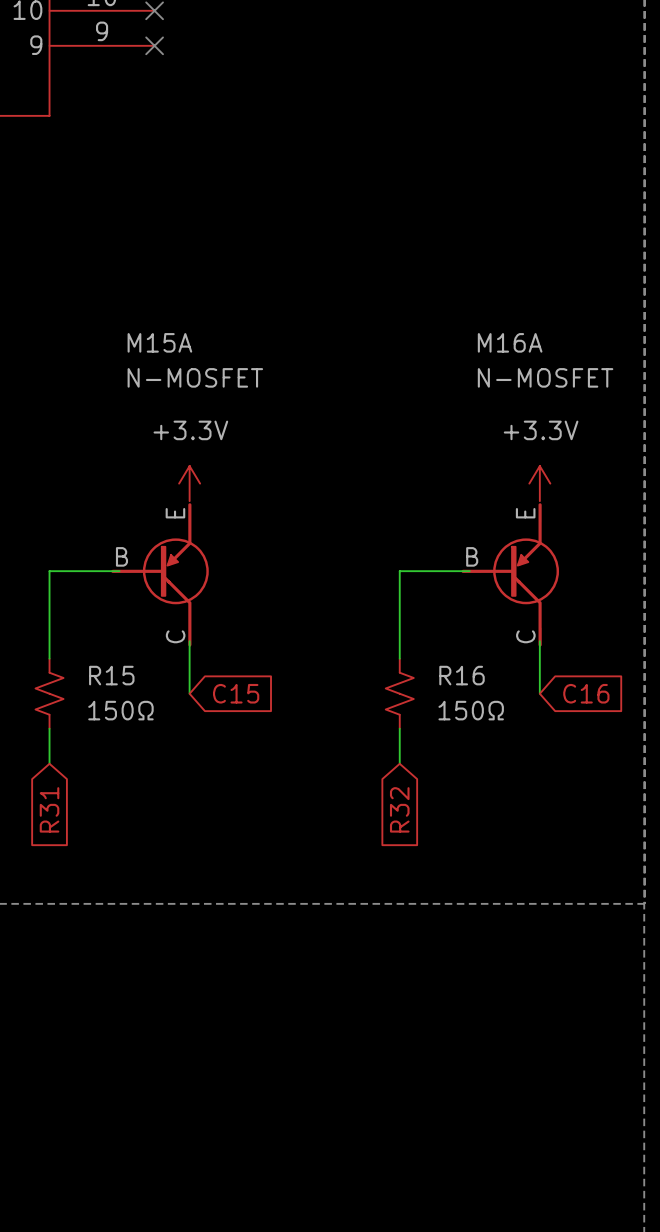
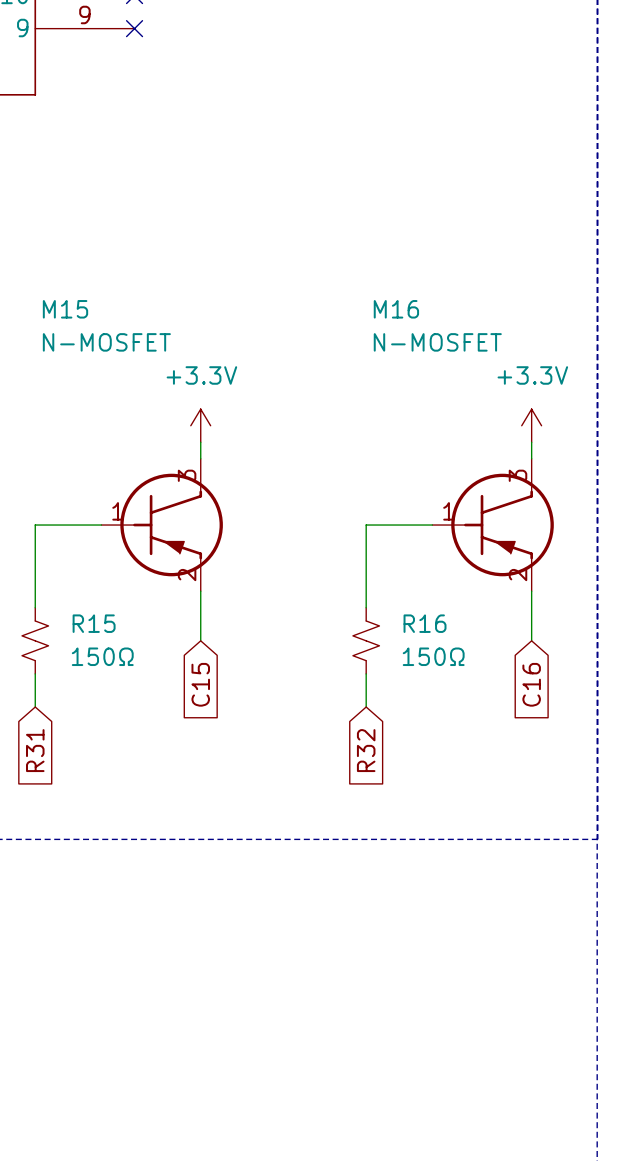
power symbol position: +3.3V (189, 483) -> +3.3V (200, 425)
wire: none -> (200, 442) (200, 458)
power symbol position: +3.3V (539, 483) -> +3.3V (531, 425)
wire: none -> (531, 442) (531, 458)
M15: none -> N-MOSFET (162, 525)
M16: none -> N-MOSFET (493, 525)
M15A: N-MOSFET (160, 574) -> none
M16A: N-MOSFET (510, 574) -> none
wire: (189, 641) (189, 693) -> (200, 591) (200, 640)
wire: (539, 641) (539, 693) -> (531, 591) (531, 640)
global label rotation: 0° (236, 693) -> 90° clockwise (200, 684)
global label rotation: 0° (586, 693) -> 90° clockwise (531, 684)

